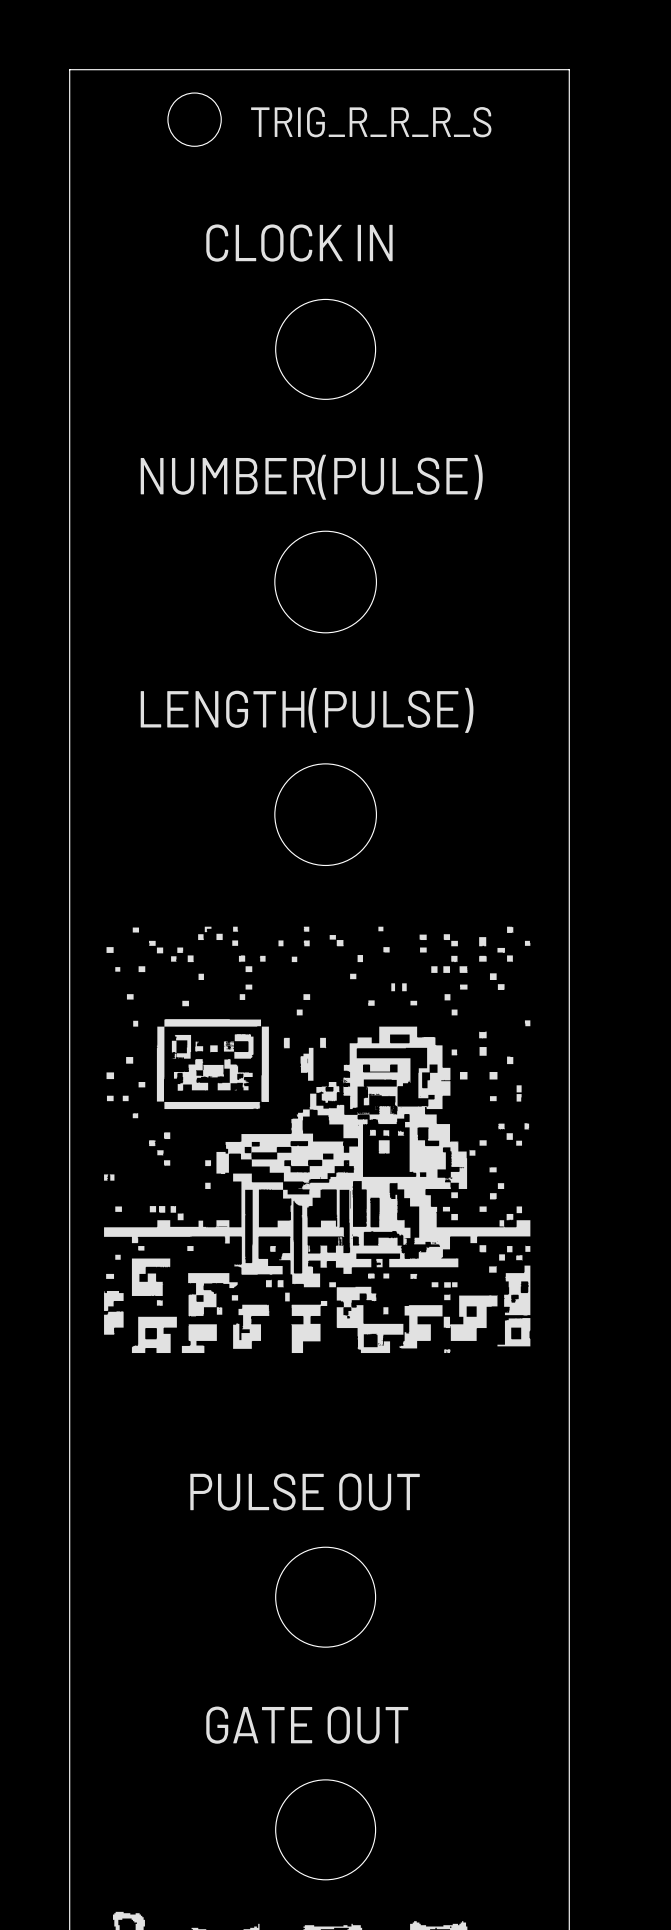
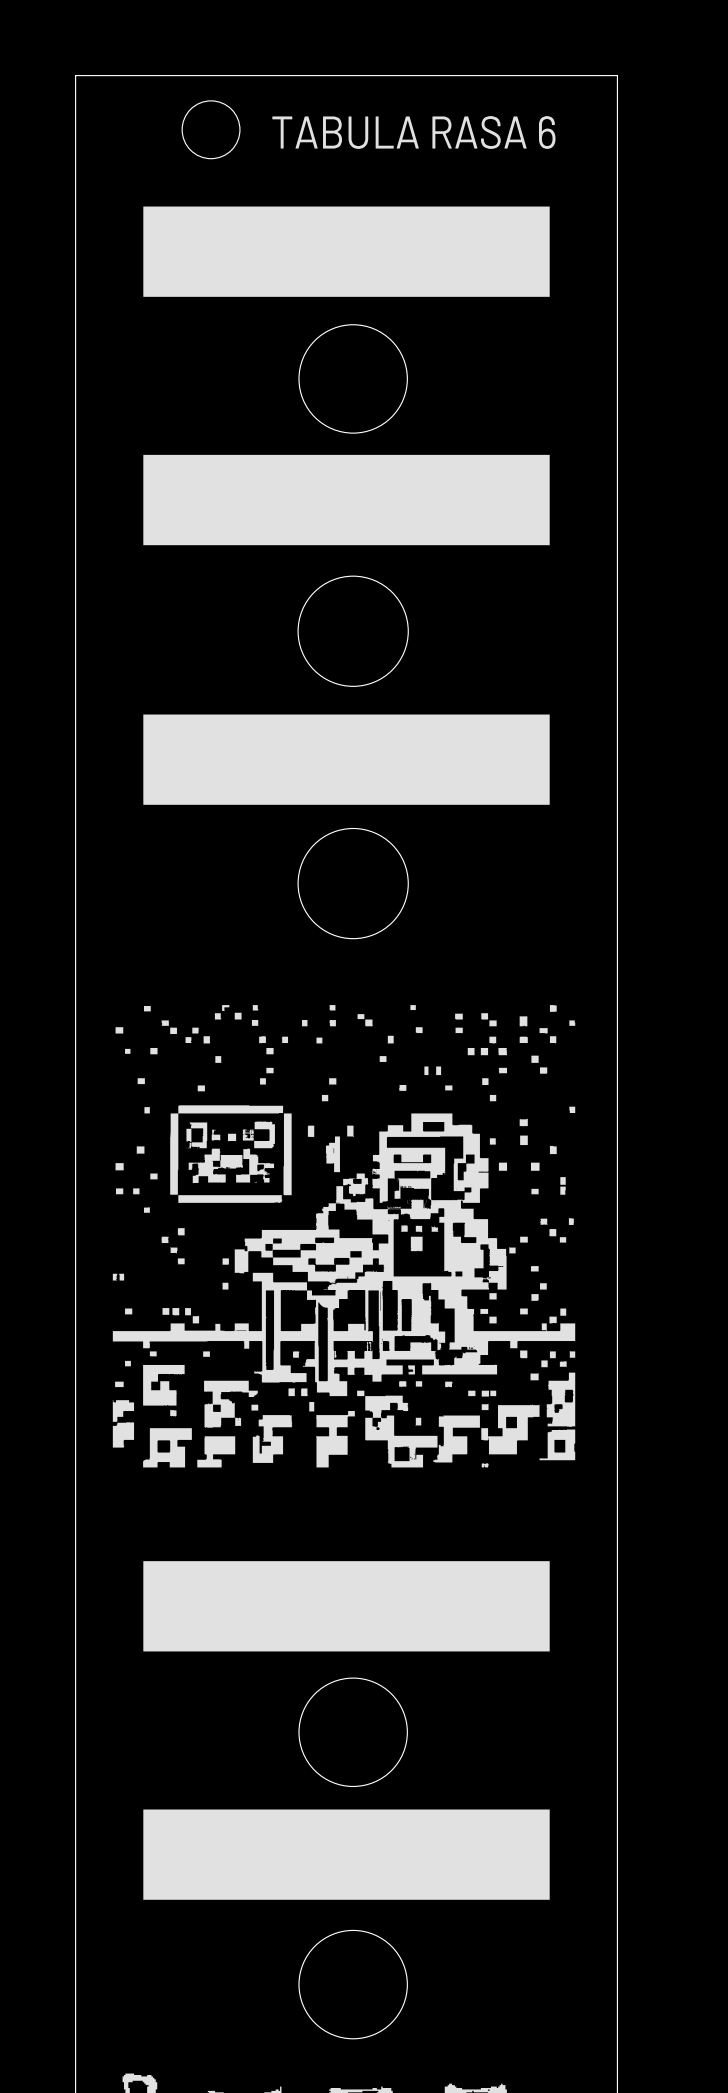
text: TRIG_R_R_R_S (371, 122) -> TABULA RASA 6 (413, 132)
drawing: none -> [143, 206, 550, 297]
text: CLOCK IN (299, 243) -> none
drawing: none -> [143, 454, 550, 546]
text: NUMBER(PULSE) (311, 477) -> none
drawing: none -> [143, 714, 550, 805]
text: LENGTH(PULSE) (307, 710) -> none
drawing: none -> [143, 1561, 550, 1652]
text: PULSE OUT (305, 1492) -> none
drawing: none -> [143, 1809, 550, 1900]
text: GATE OUT (307, 1725) -> none

